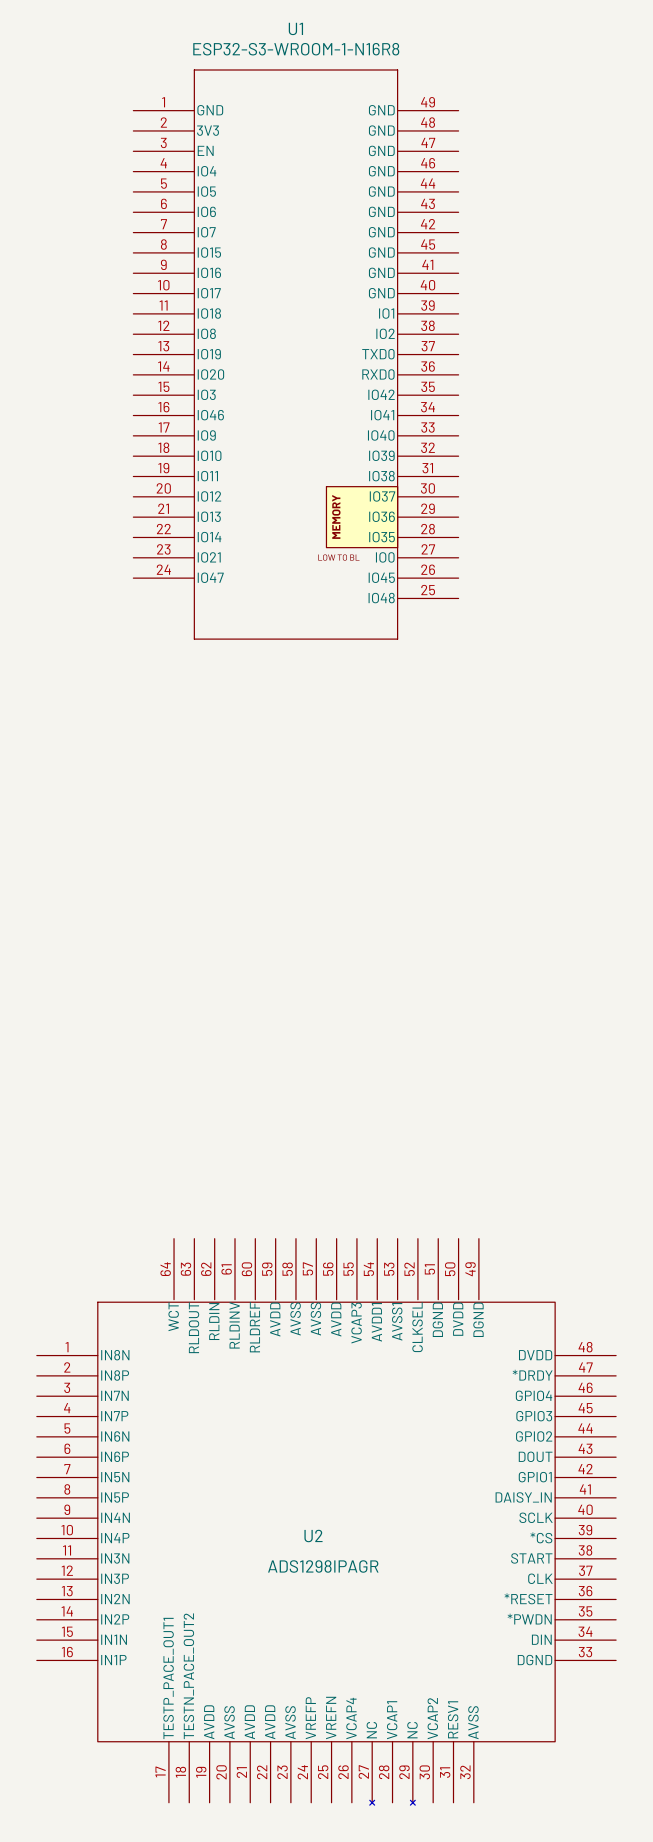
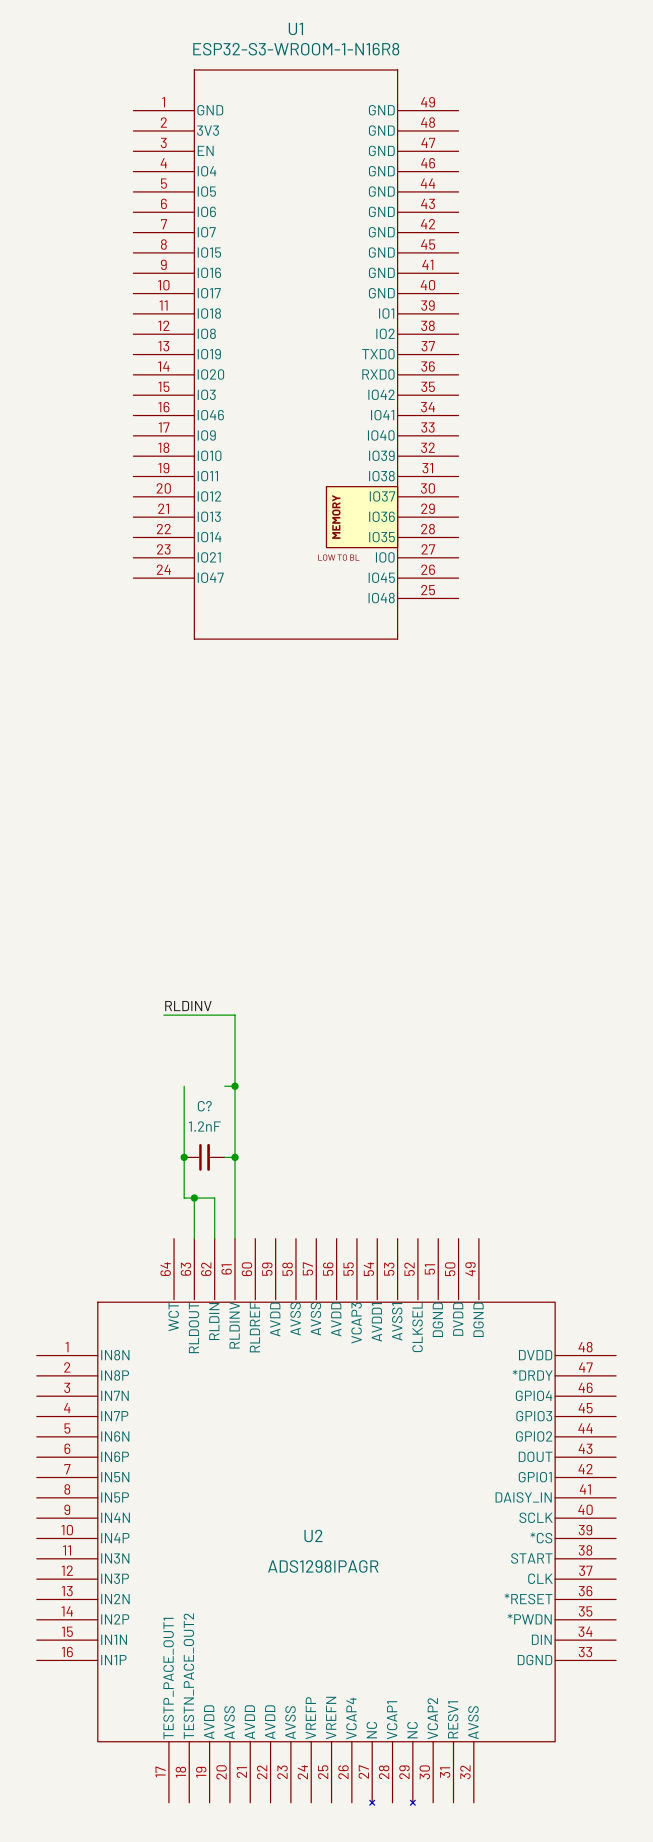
label: none -> RLDINV (188, 1006)
wire: none -> (163, 1015) (235, 1015) (235, 1238)
wire: none -> (184, 1086) (184, 1198) (214, 1198) (214, 1238)
wire: none -> (224, 1086) (235, 1086)
junction: none -> (235, 1086)
junction: none -> (184, 1157)
C?: none -> 1.2nF (204, 1157)
wire: none -> (224, 1157) (235, 1157)
junction: none -> (235, 1157)
wire: none -> (194, 1198) (194, 1238)
junction: none -> (194, 1198)

